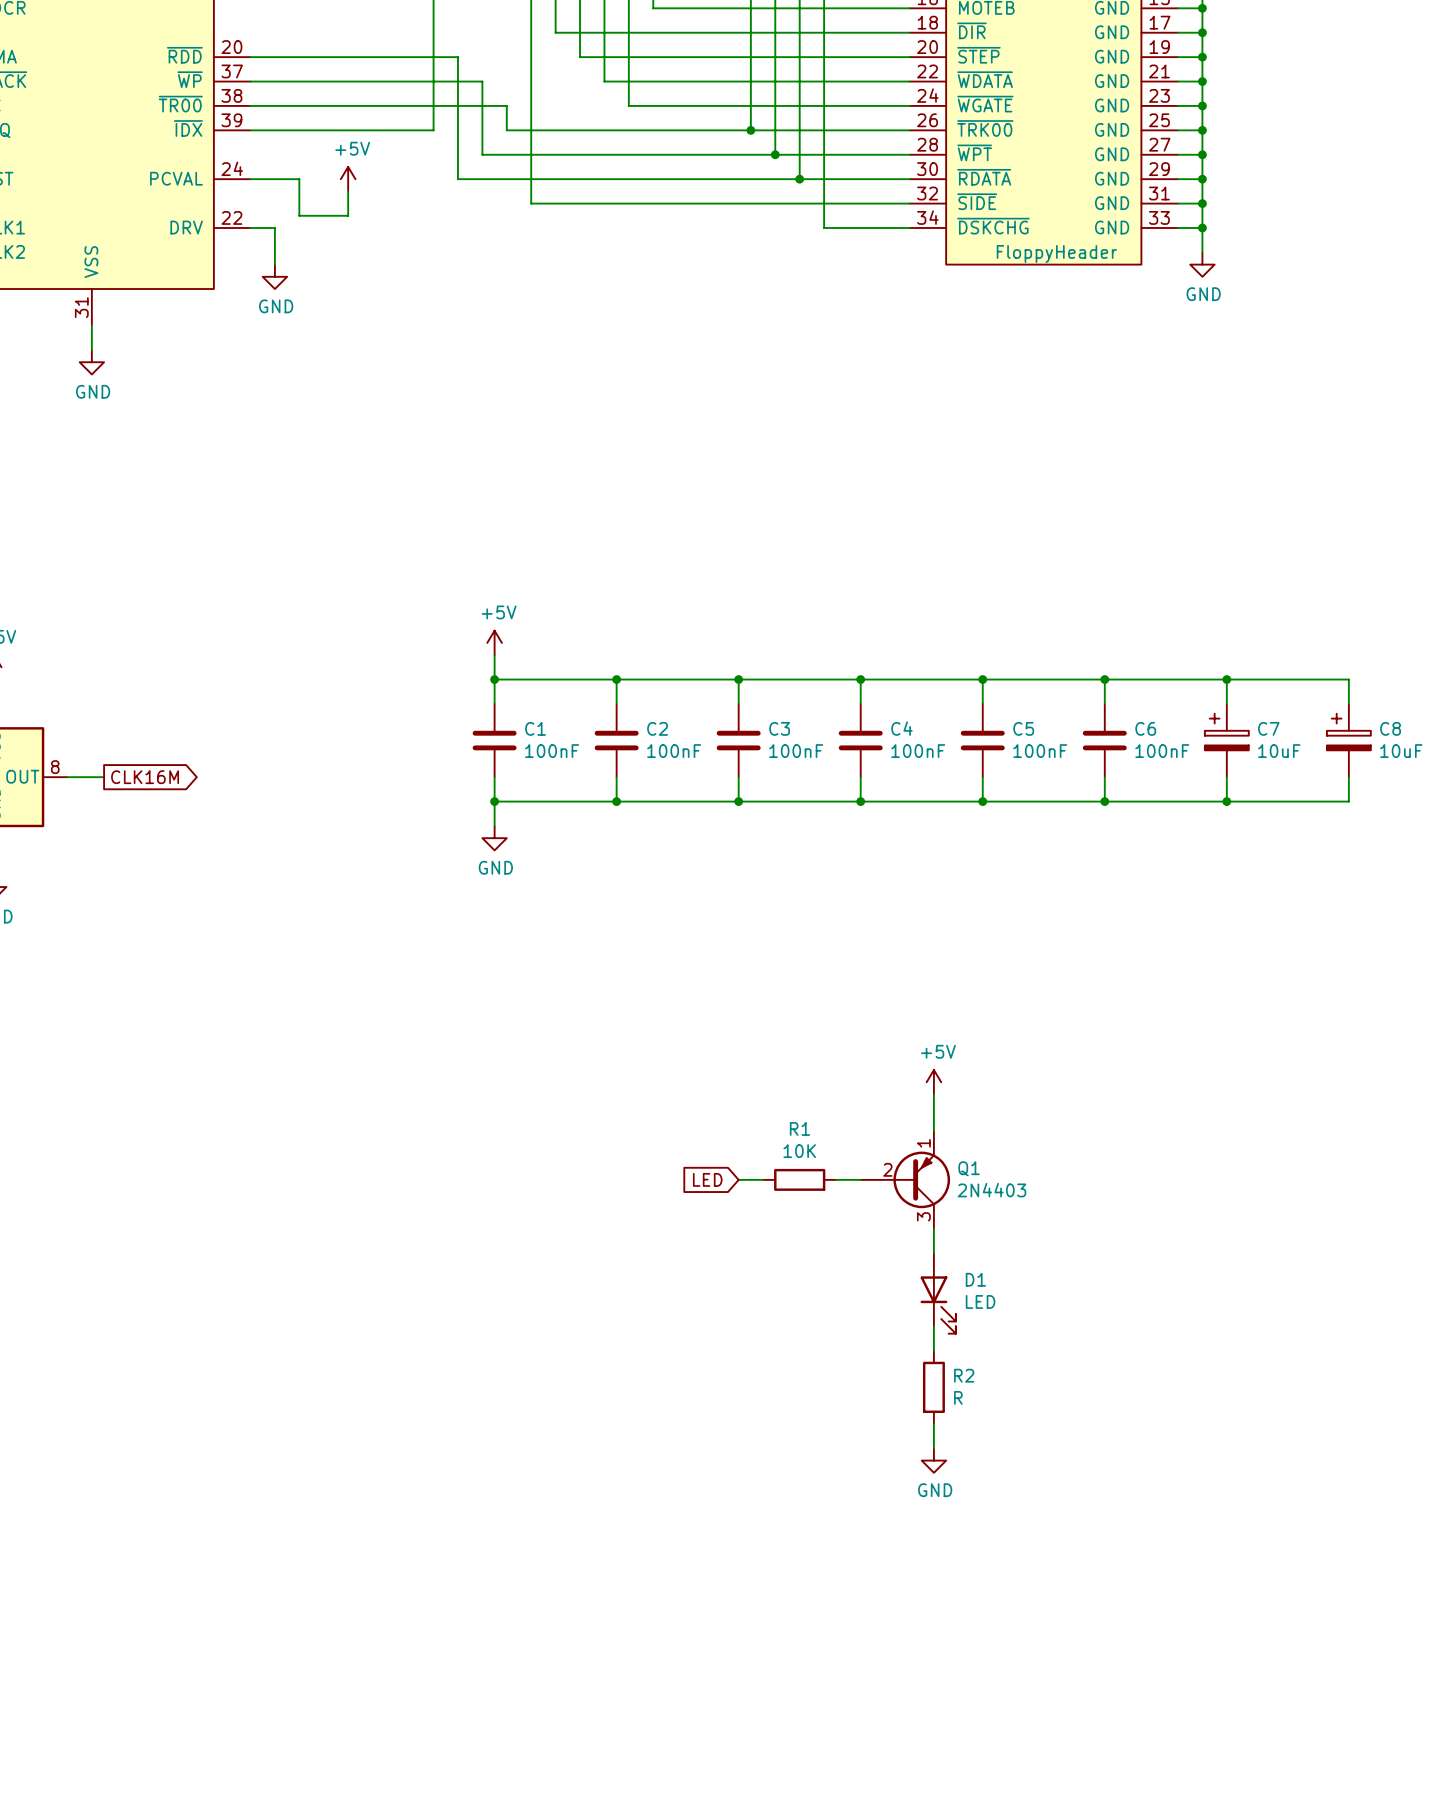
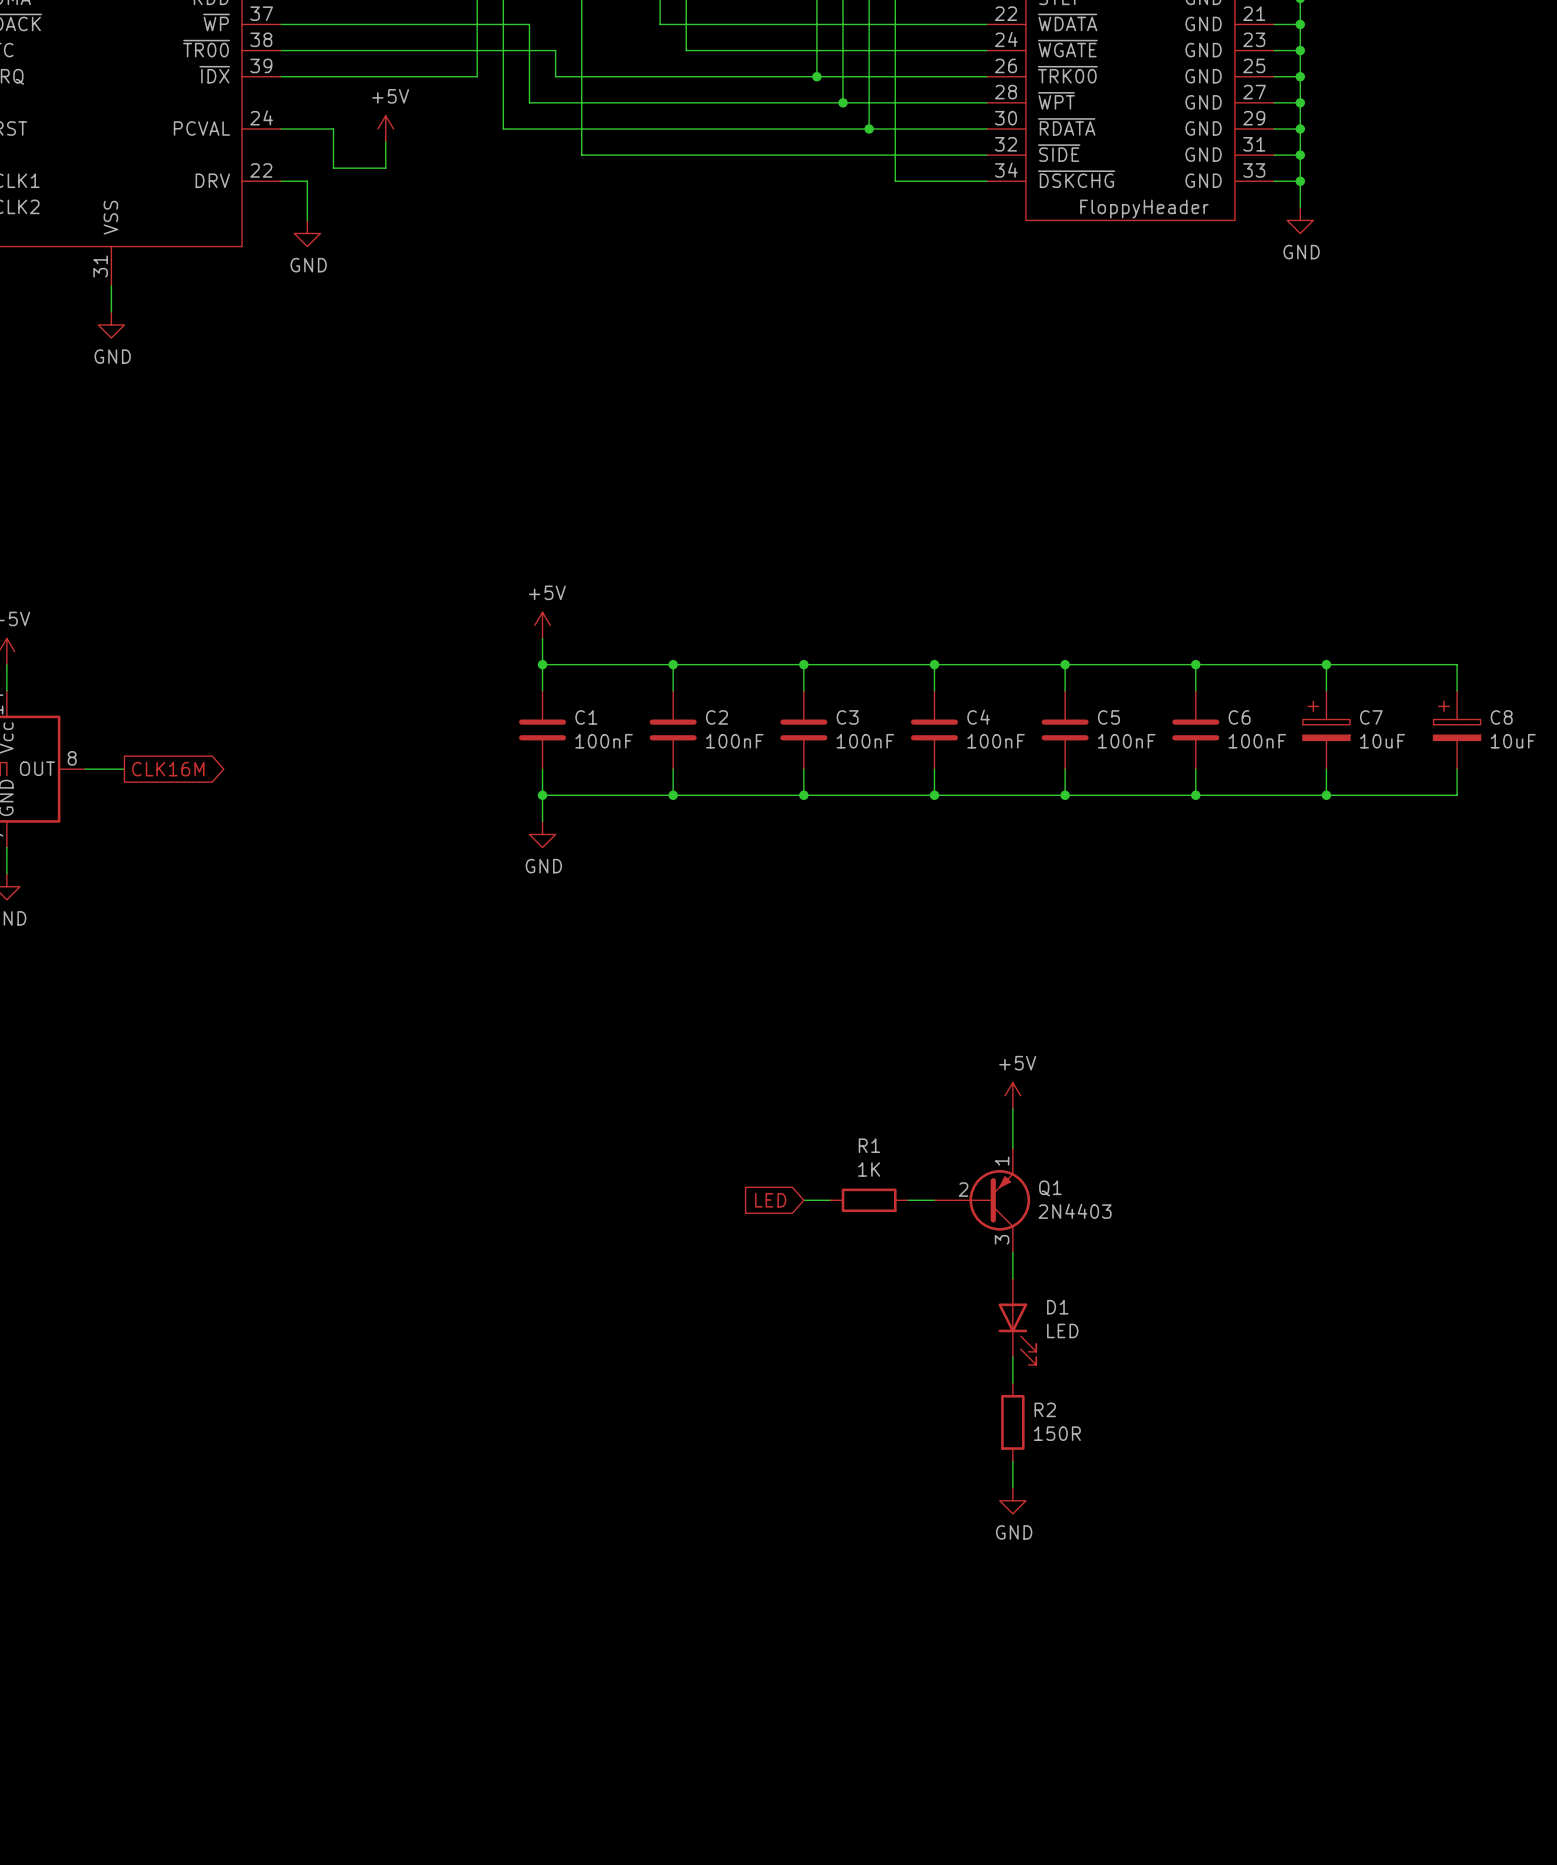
R1 value: 10K (799, 1151) -> 1K (869, 1169)
R2 value: R (958, 1397) -> 150R (1057, 1433)

